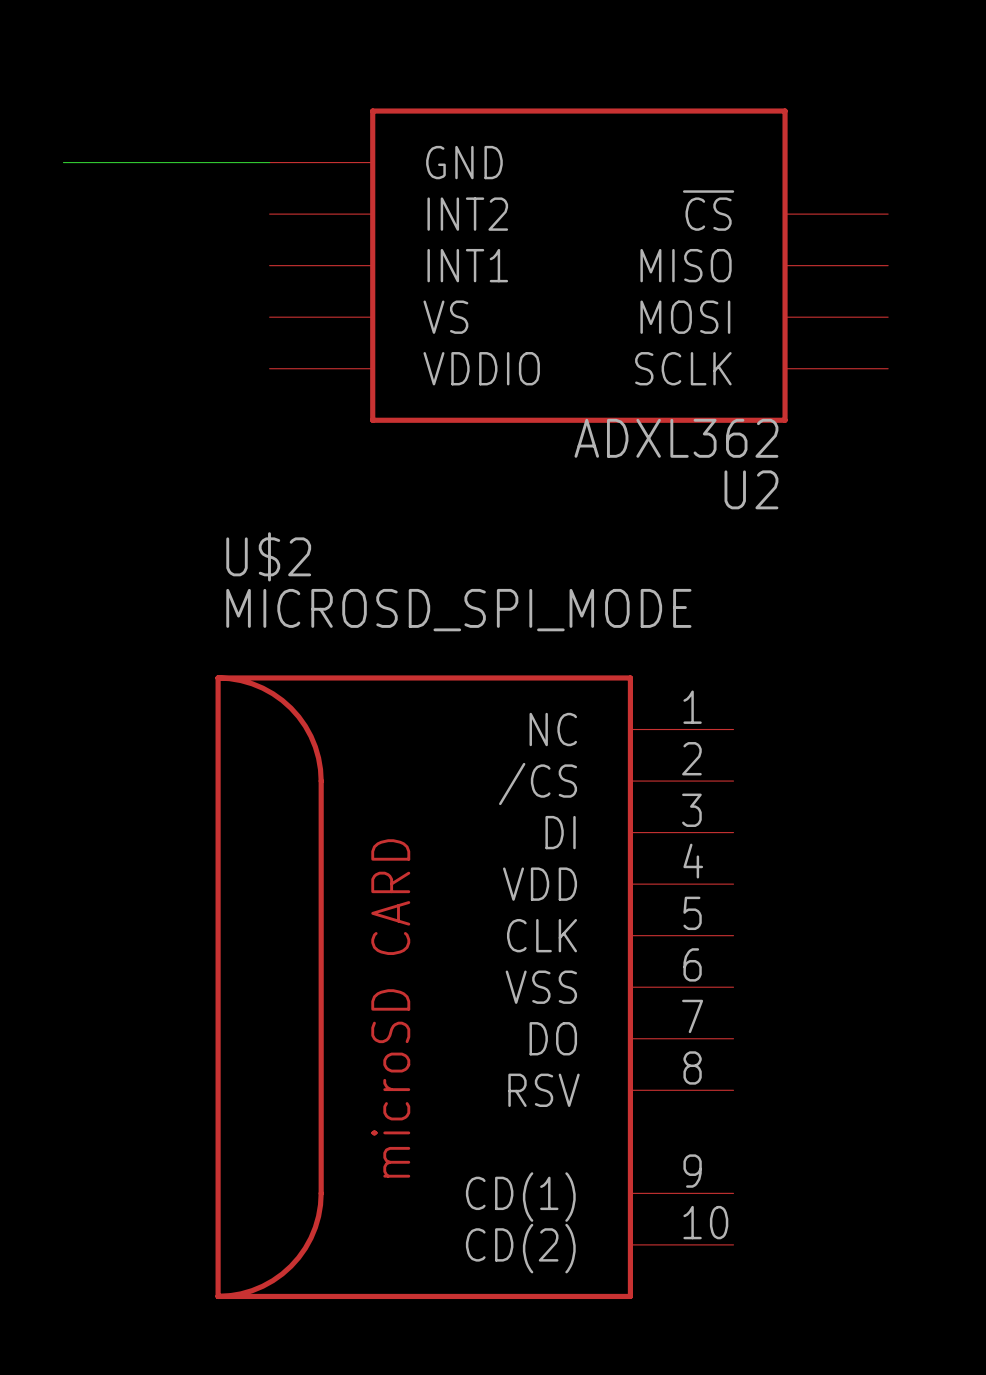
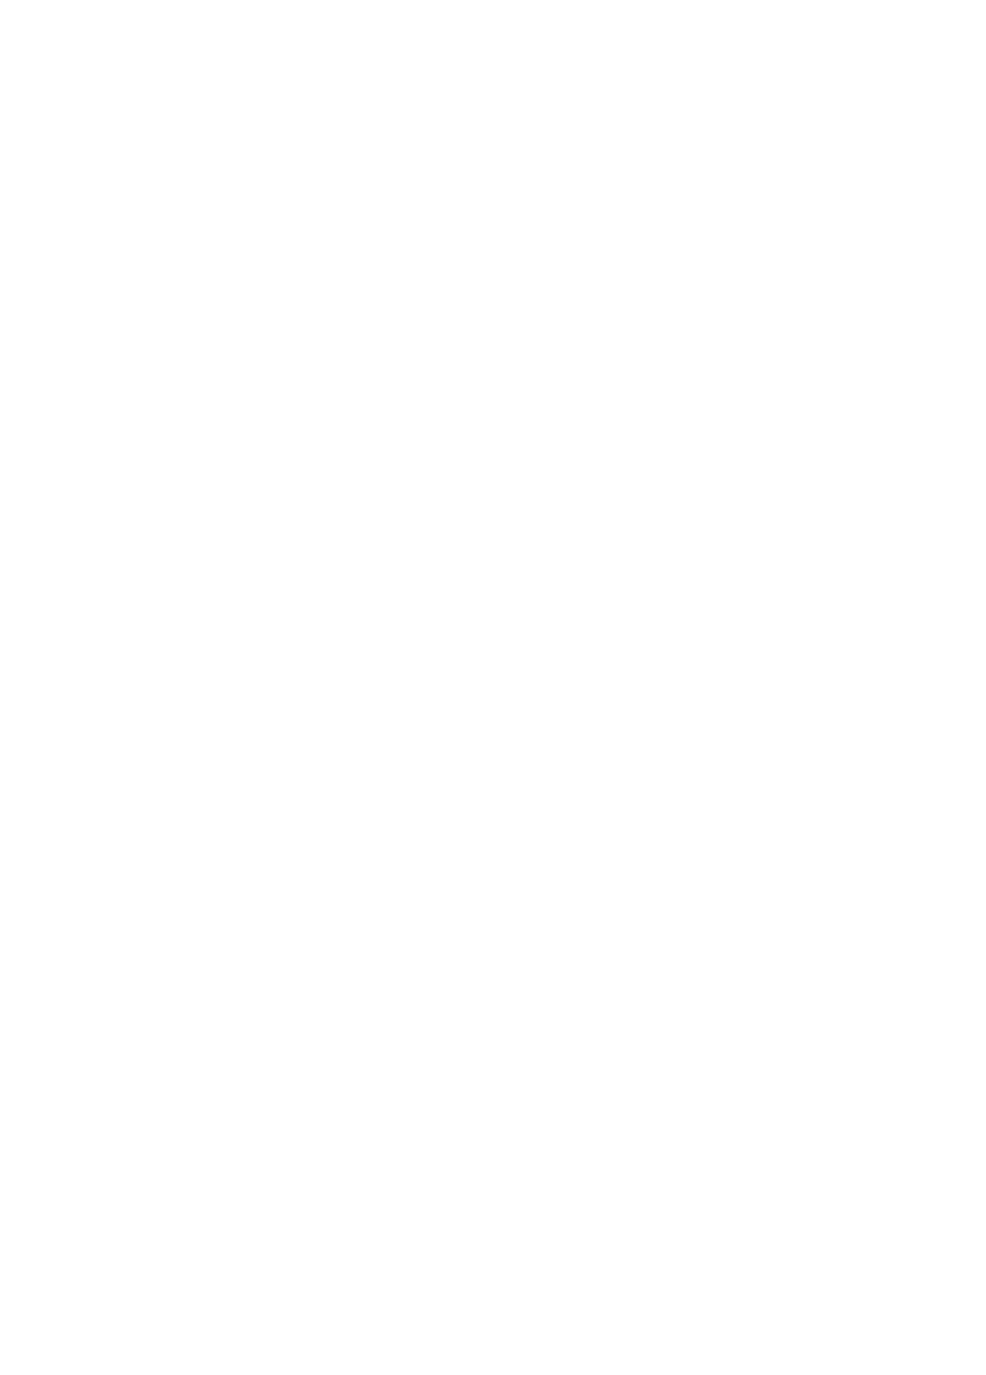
wire: (63, 162) (269, 162) -> none
U2: ADXL362 (578, 265) -> none
U$2: MICROSD_SPI_MODE (474, 987) -> none

